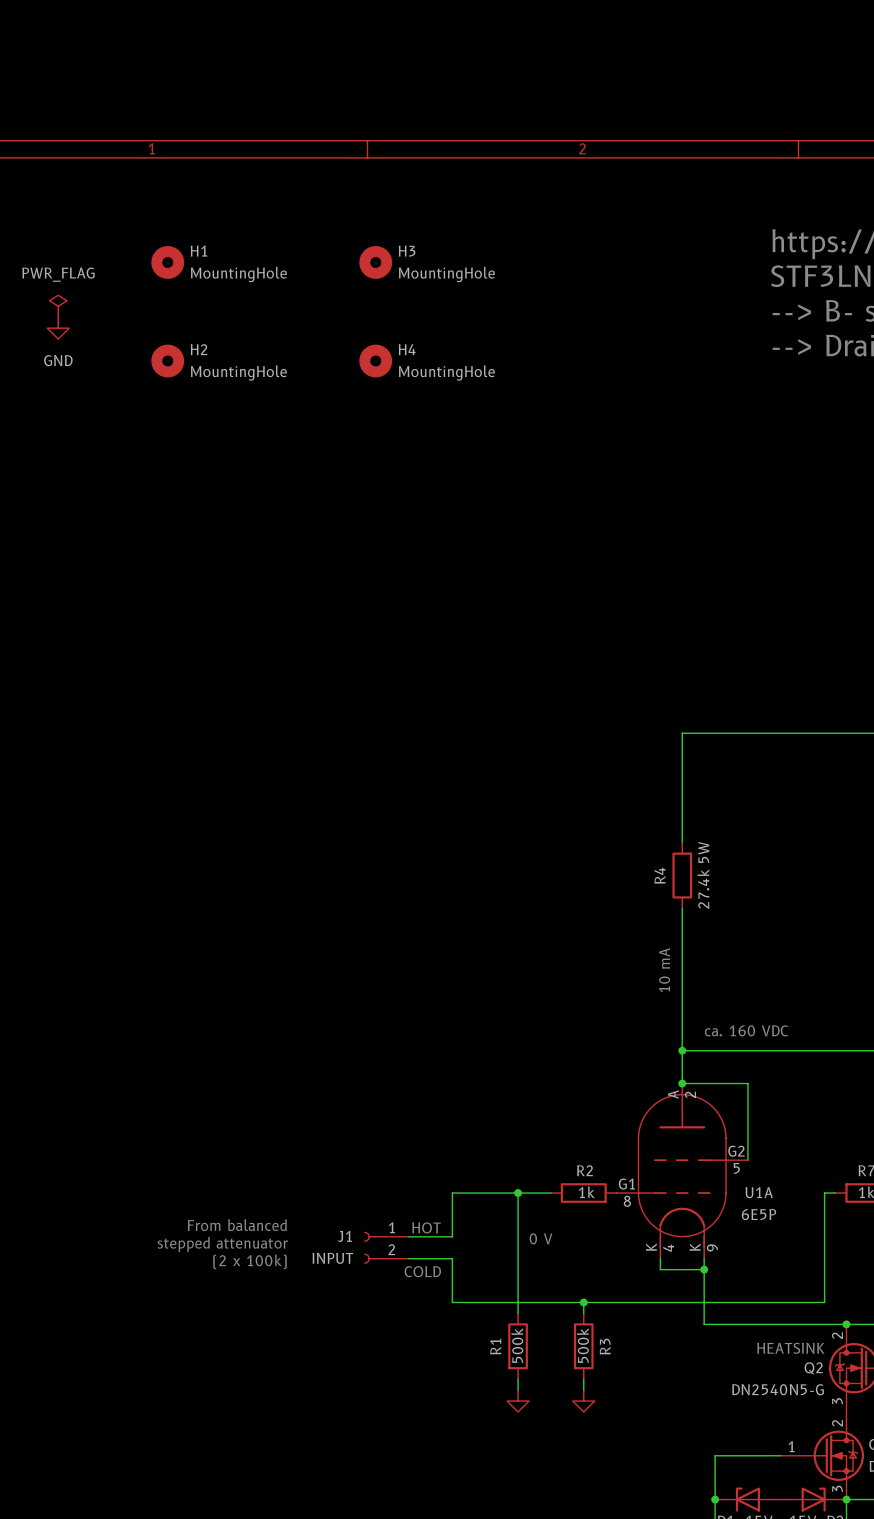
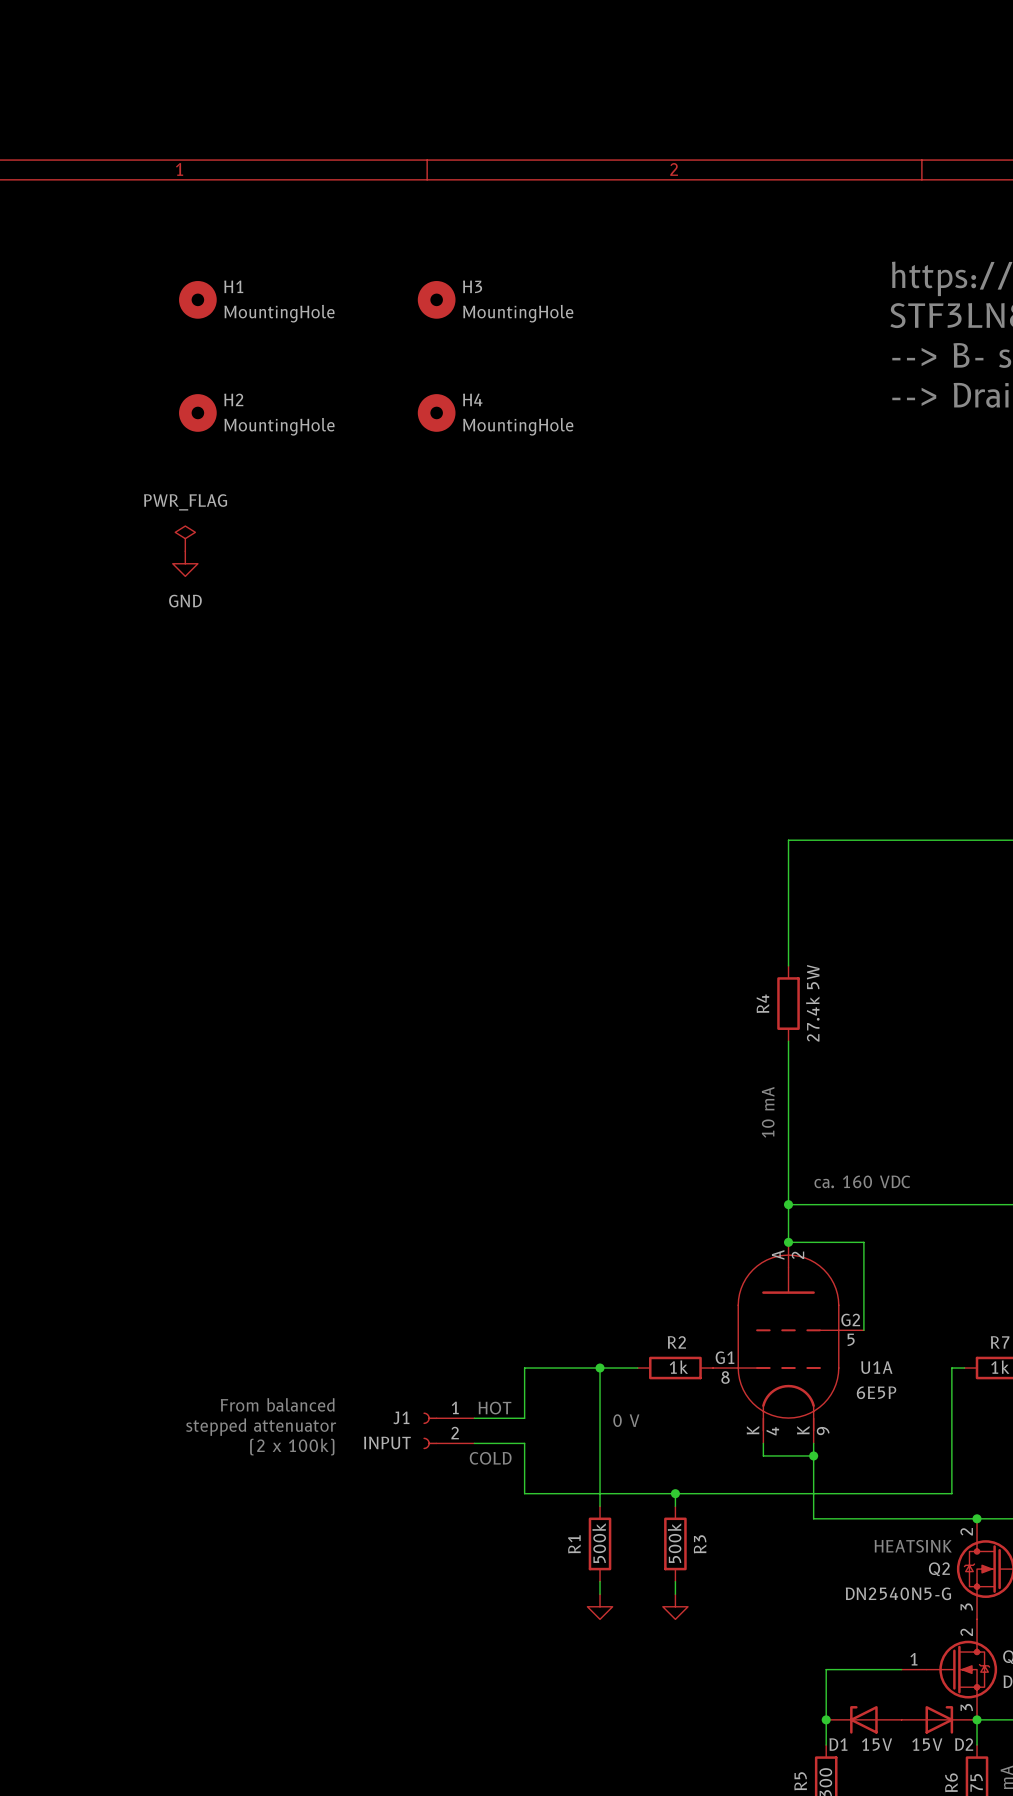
power symbol position: PWR_FLAG (58, 306) -> PWR_FLAG (185, 538)
power symbol position: GND (58, 328) -> GND (185, 563)

